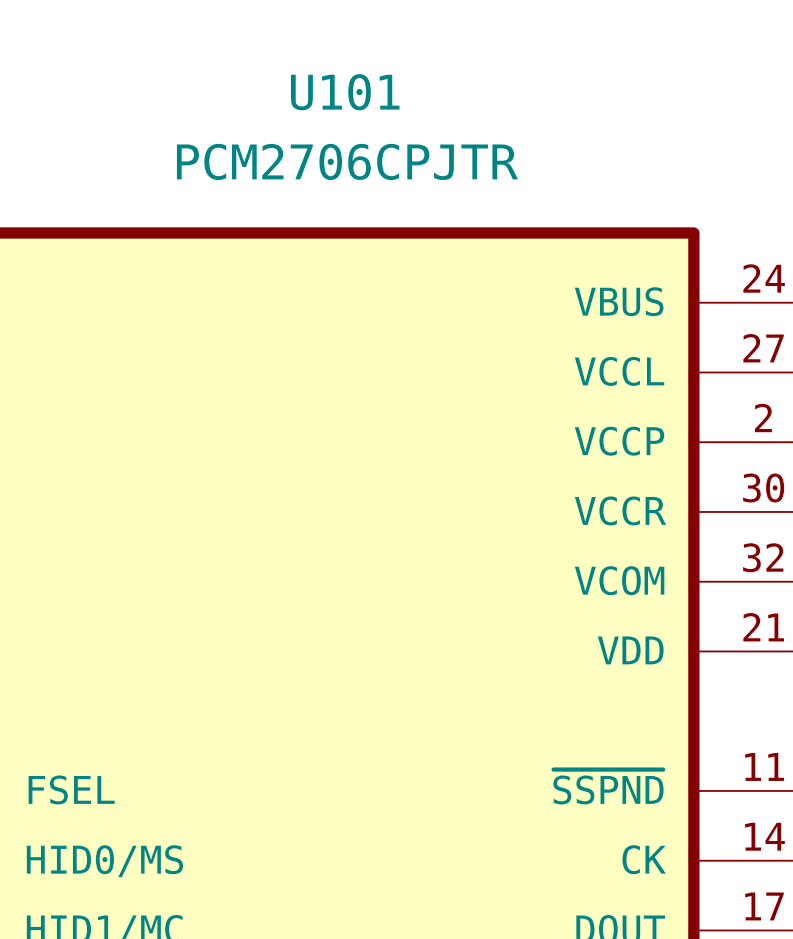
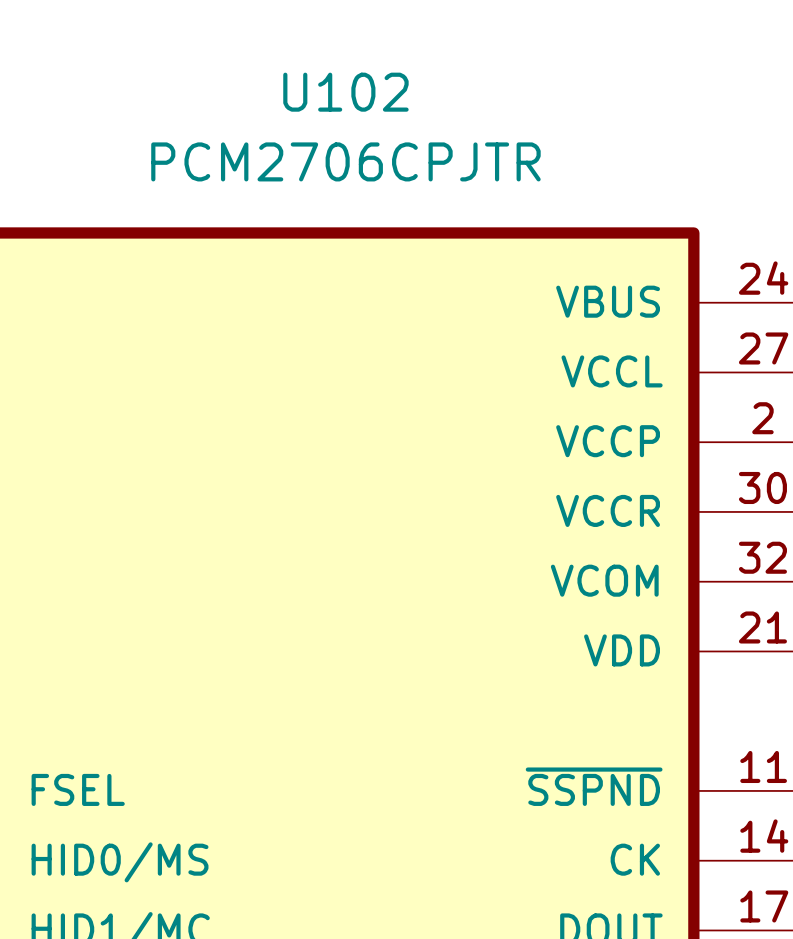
U101 name: U101 (345, 92) -> U102 (345, 92)

